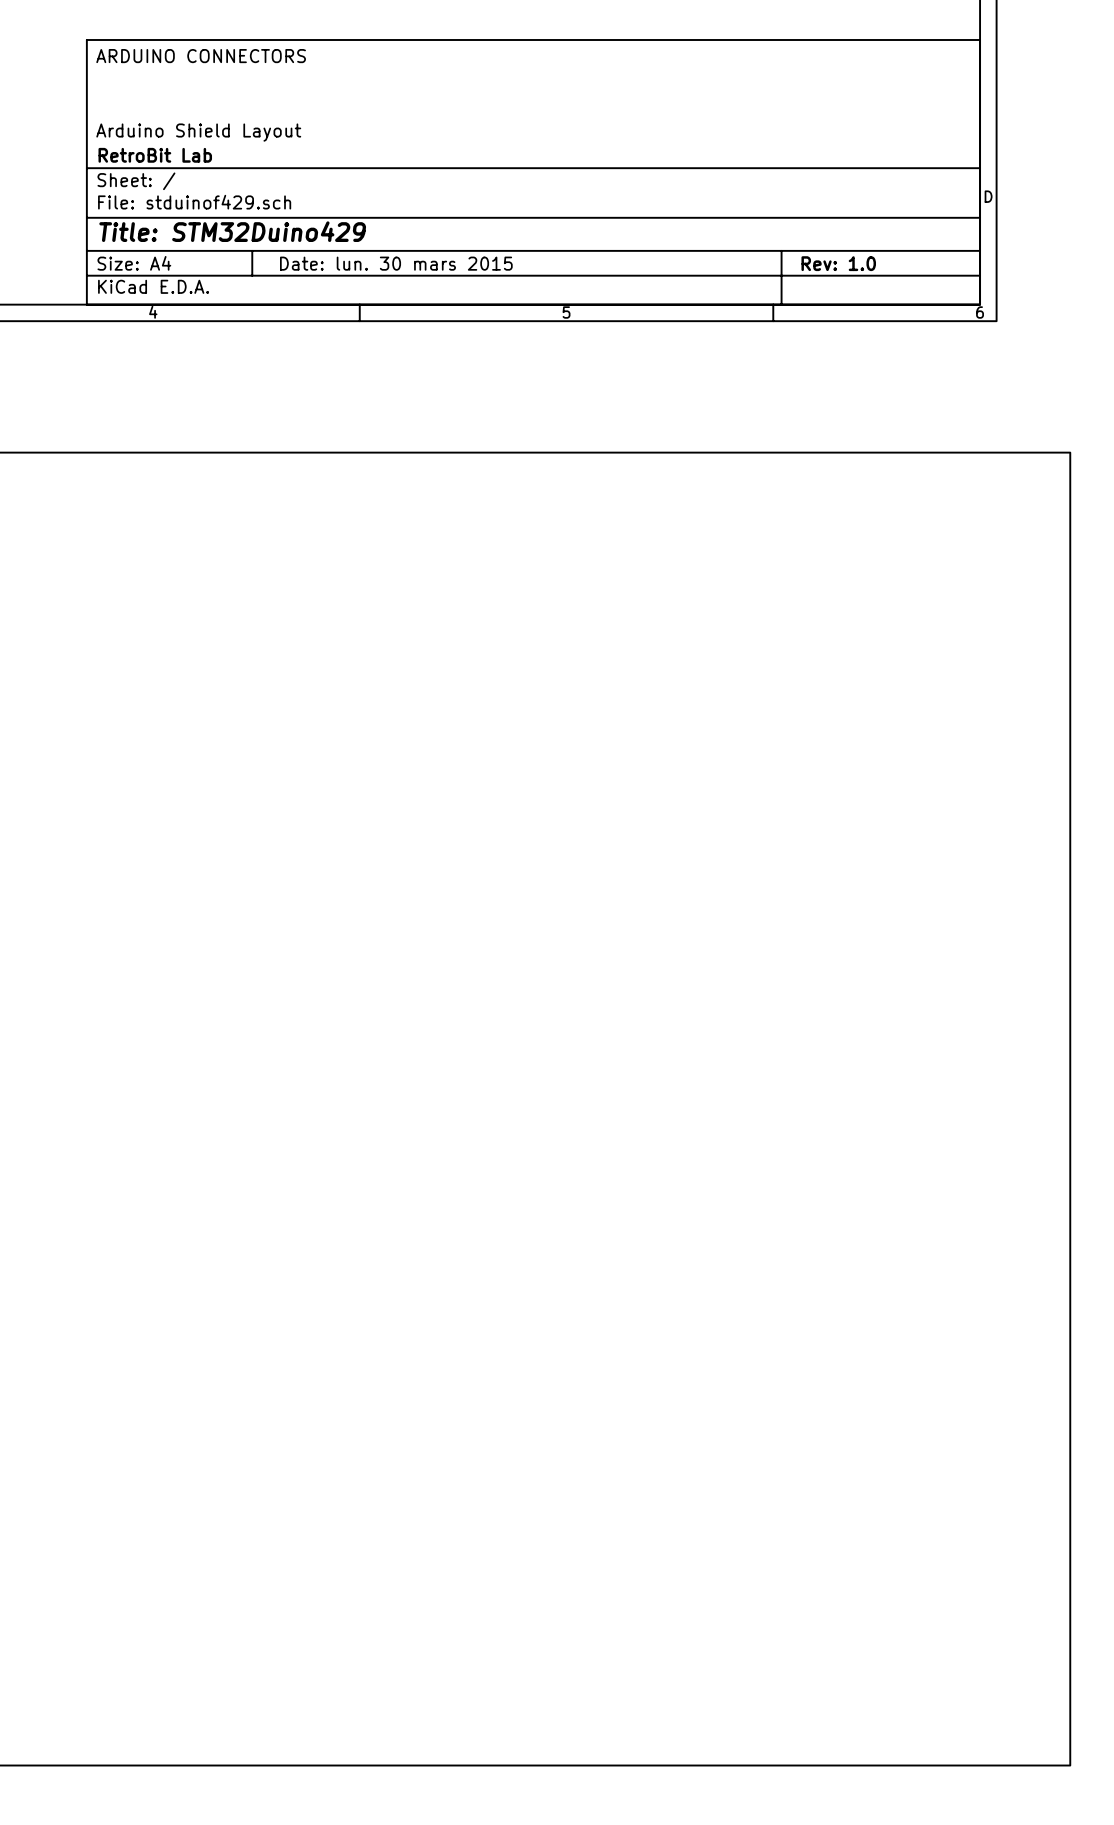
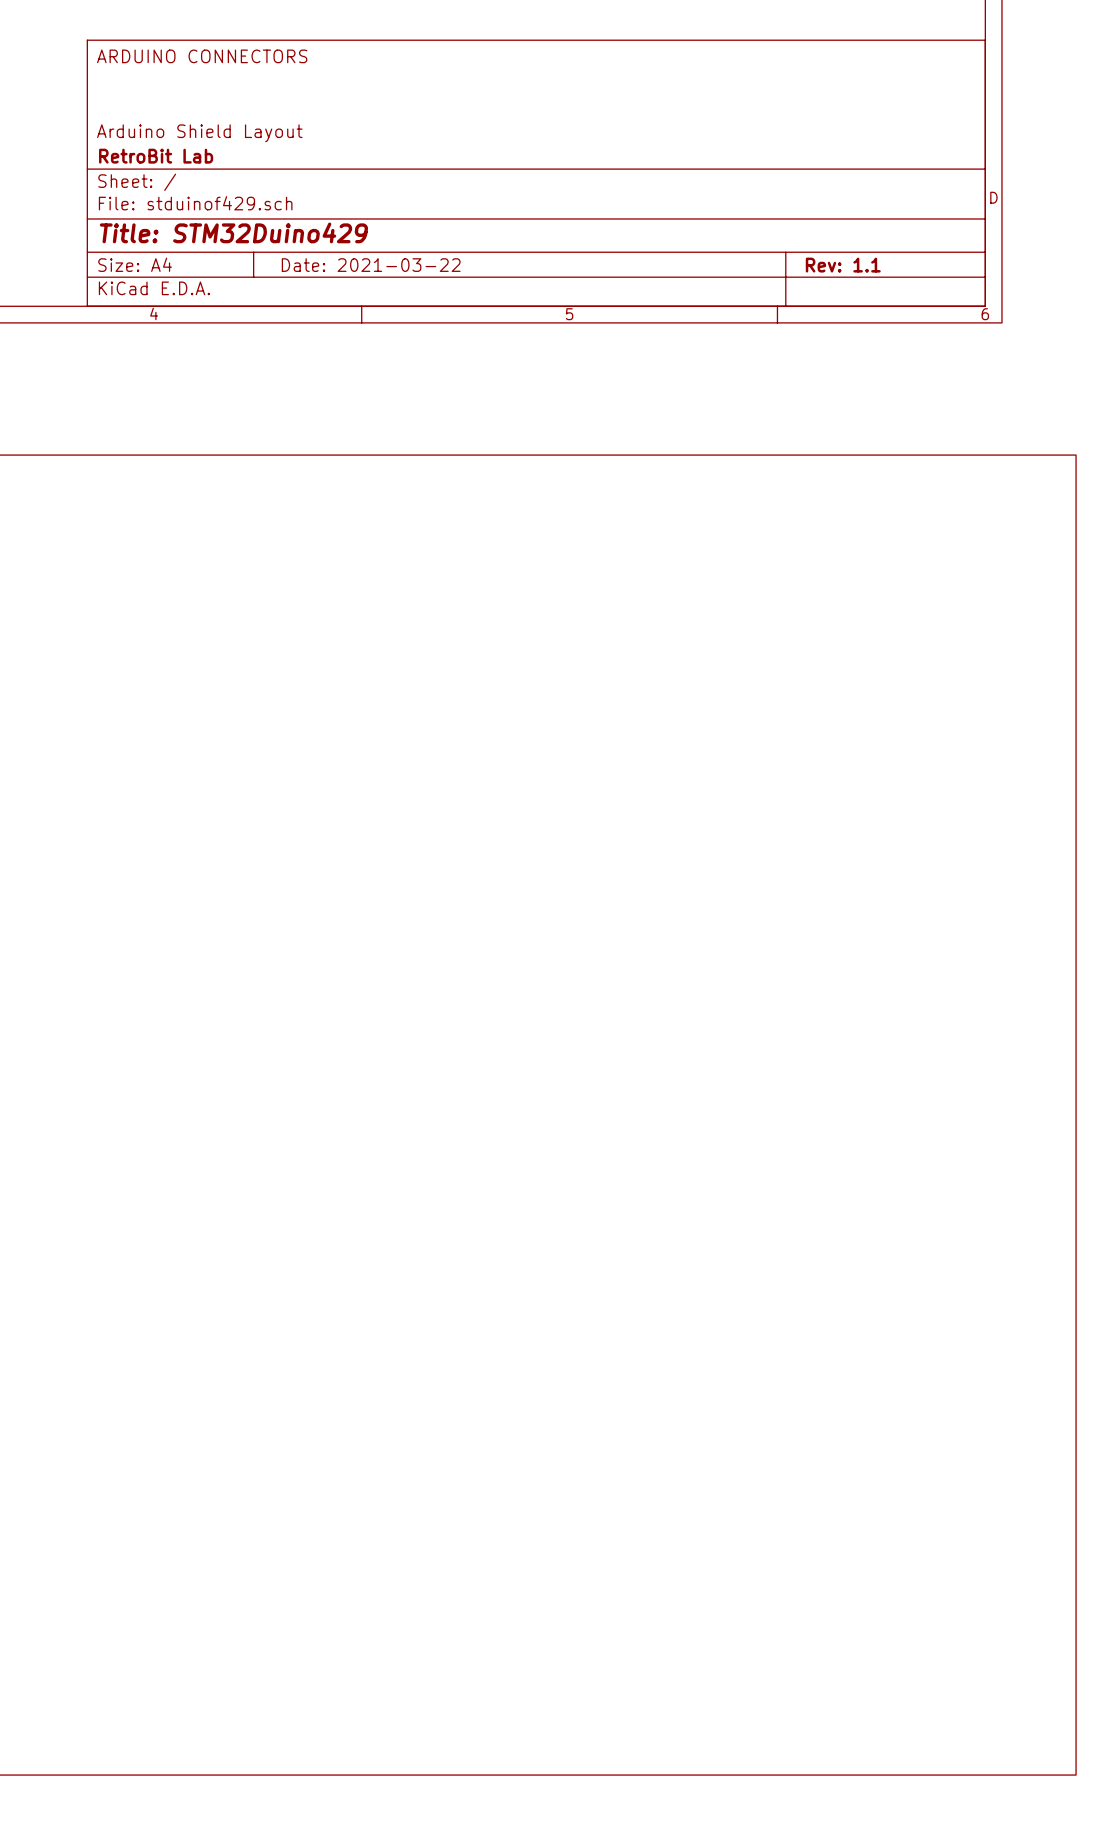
title block: Date: lun. 30 mars 2015 (396, 263) -> Date: 2021-03-22 (371, 265)
title block: Rev: 1.0 (838, 263) -> Rev: 1.1 (843, 265)

